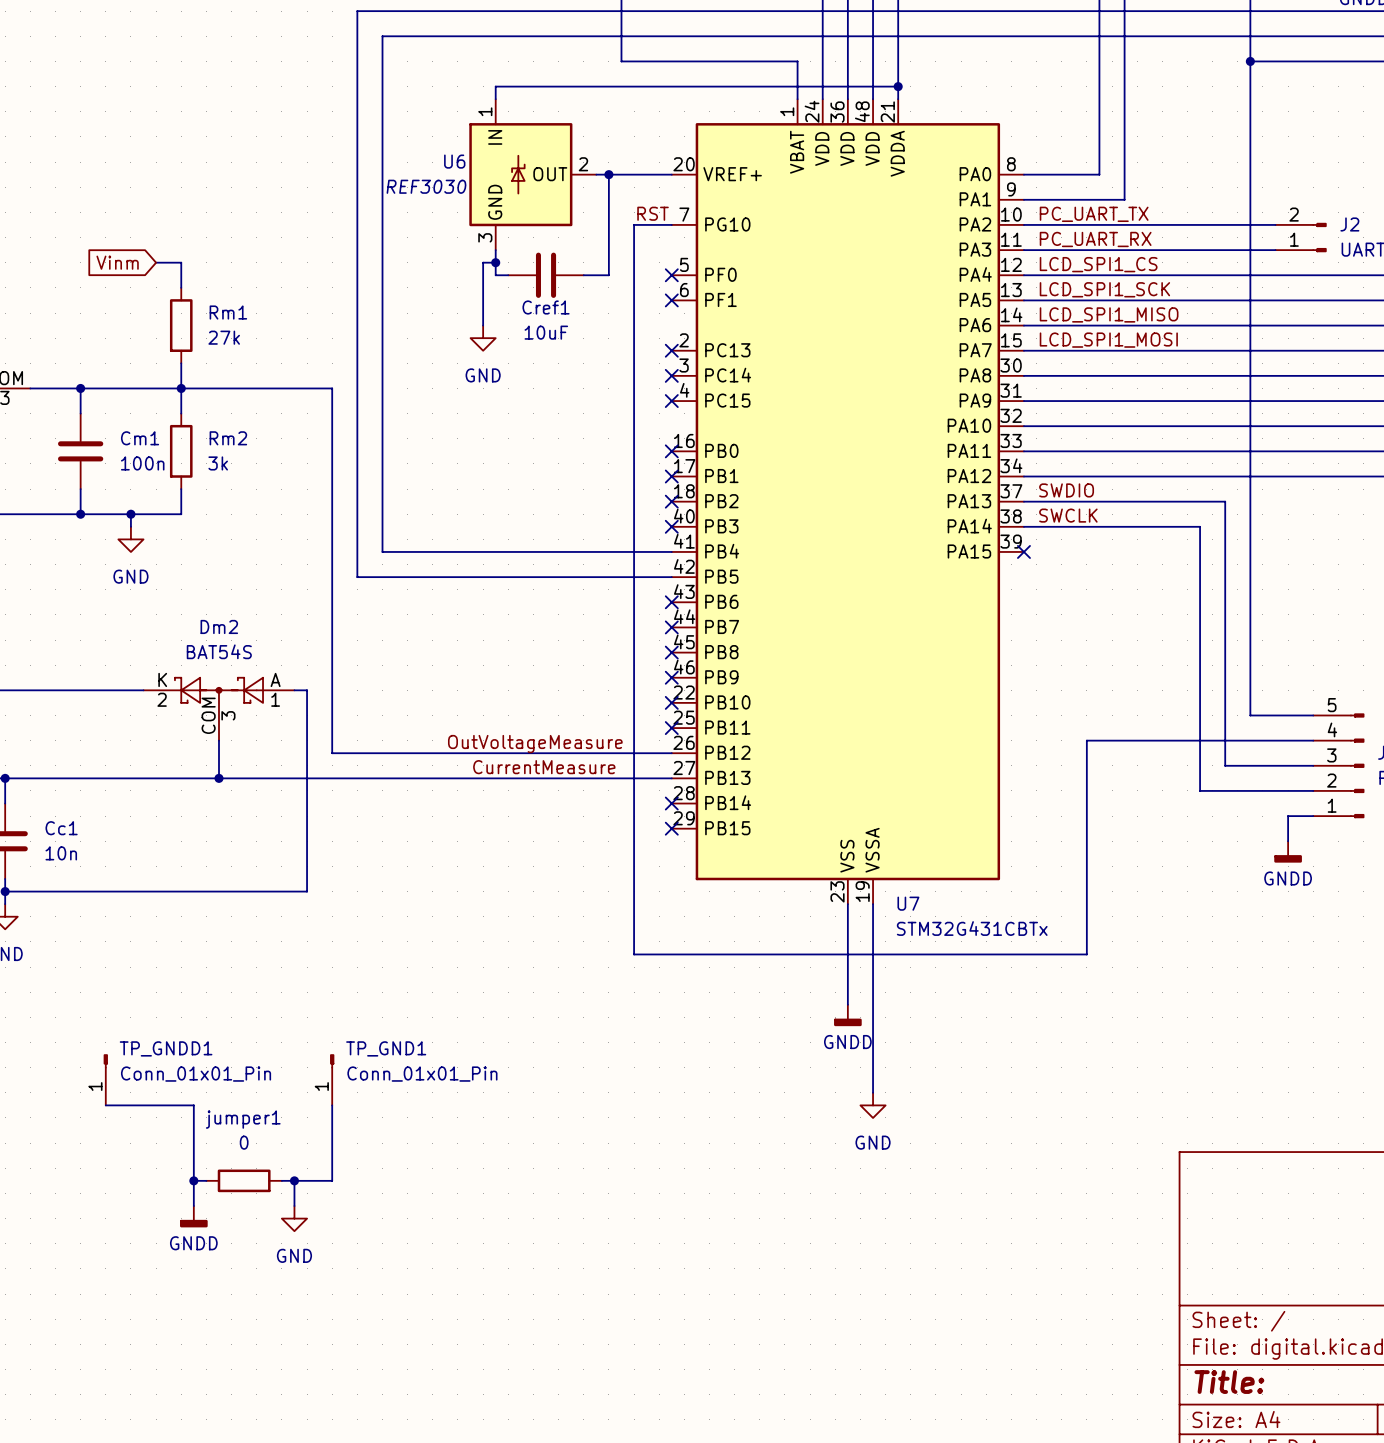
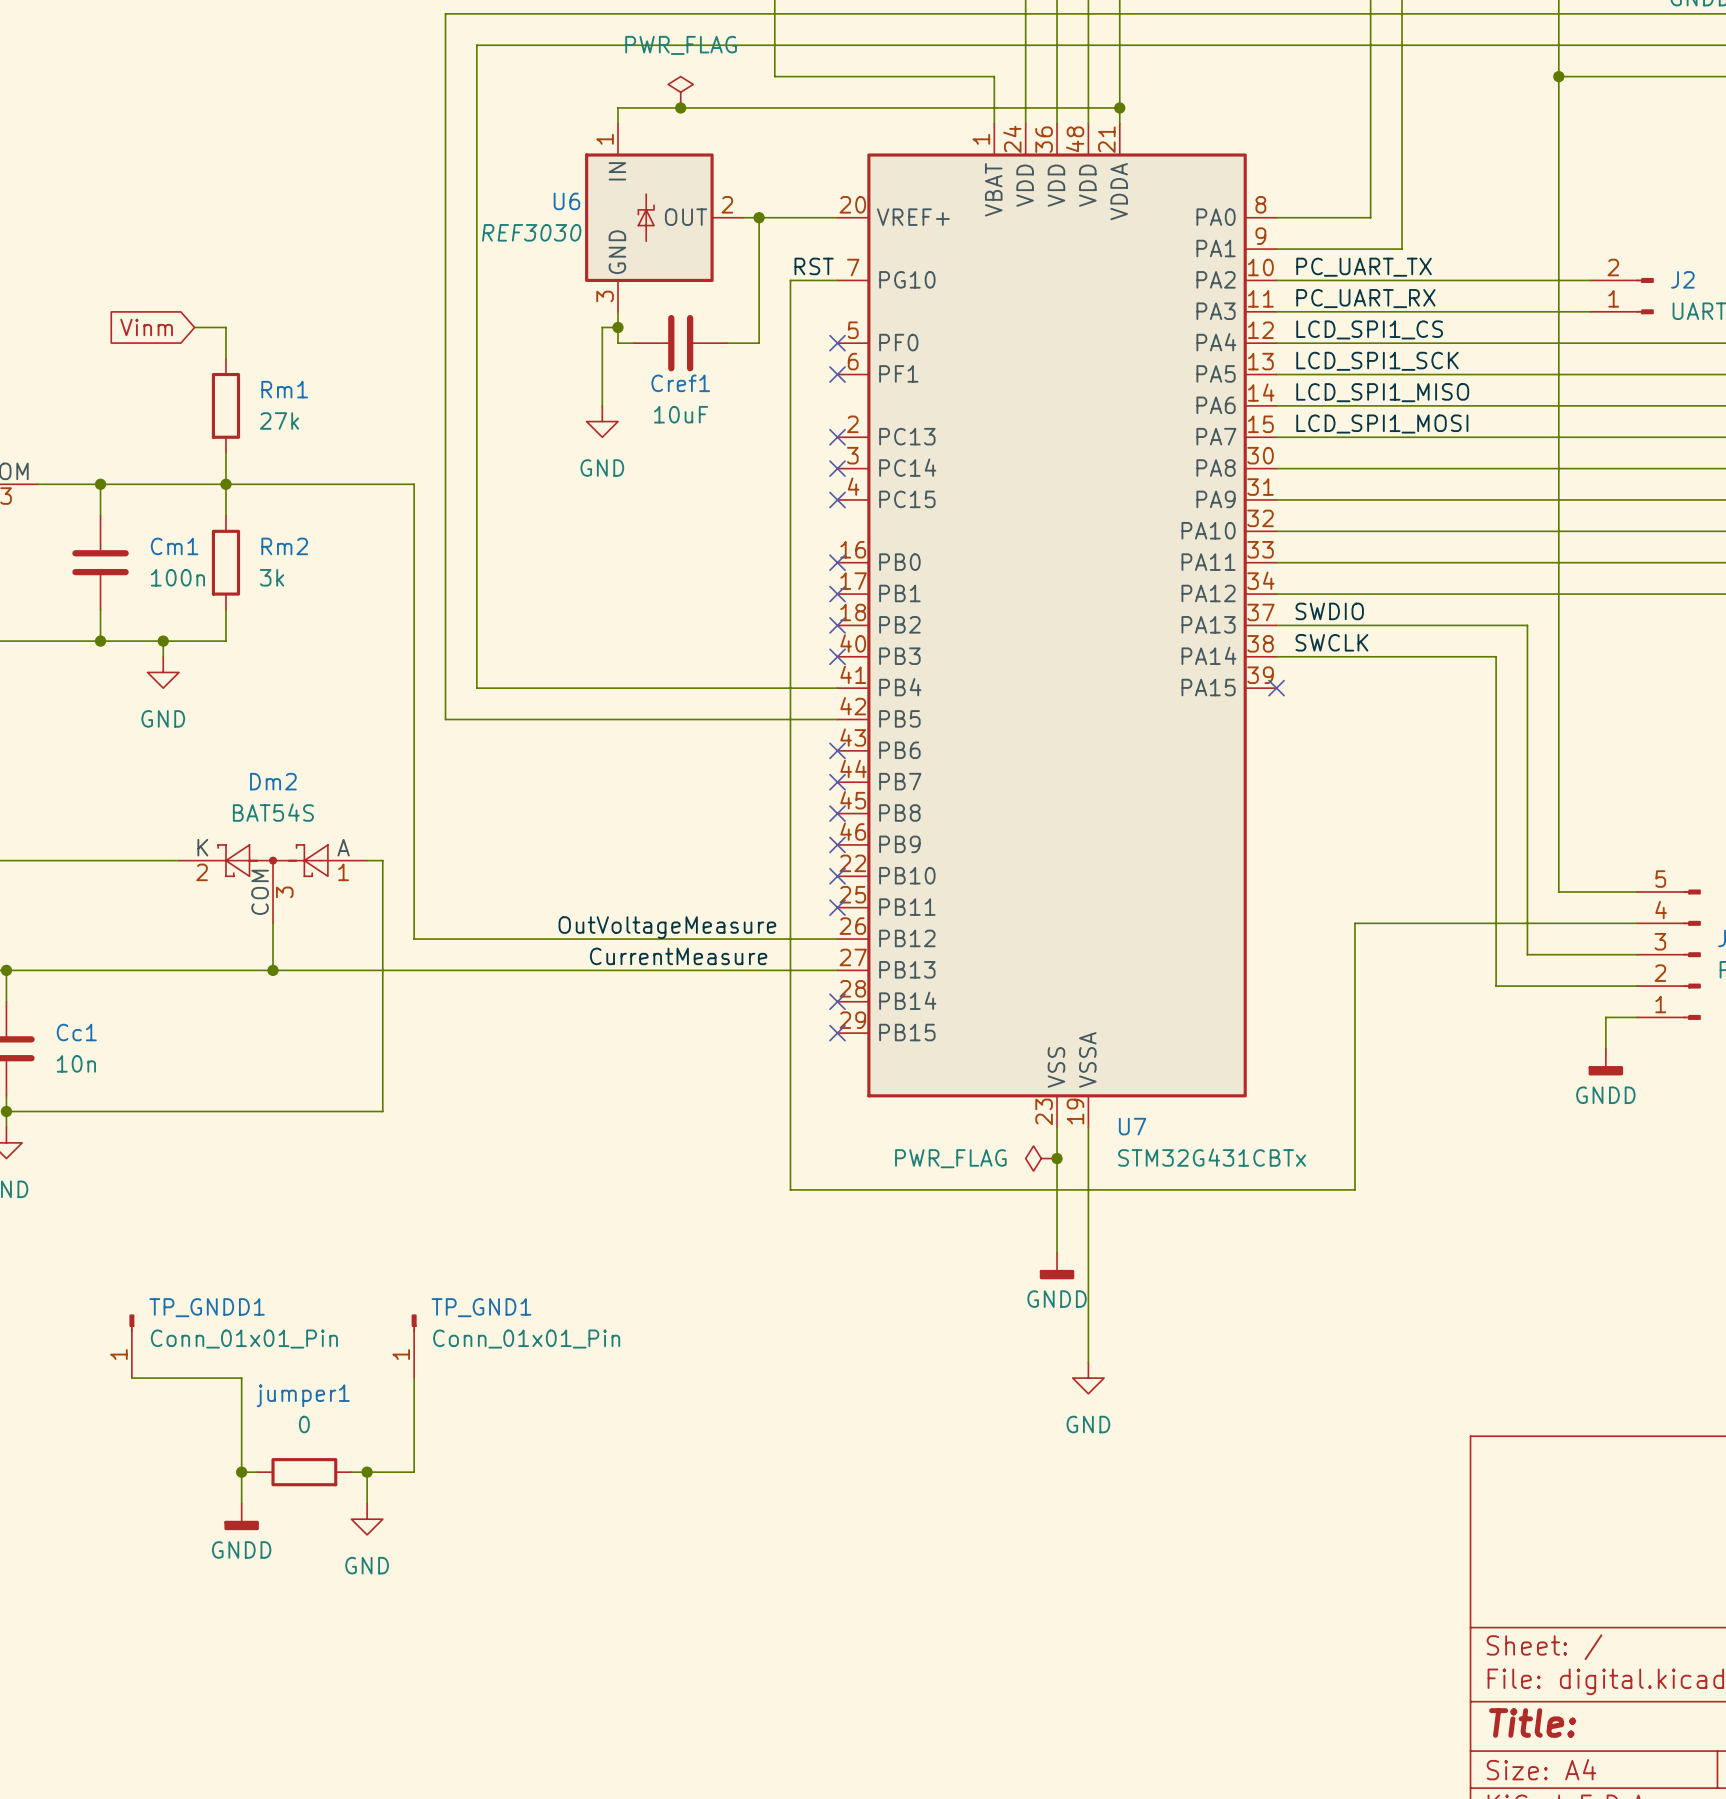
power symbol: none -> PWR_FLAG (680, 92)
junction: none -> (680, 107)
power symbol: none -> PWR_FLAG (1041, 1158)
junction: none -> (1057, 1158)

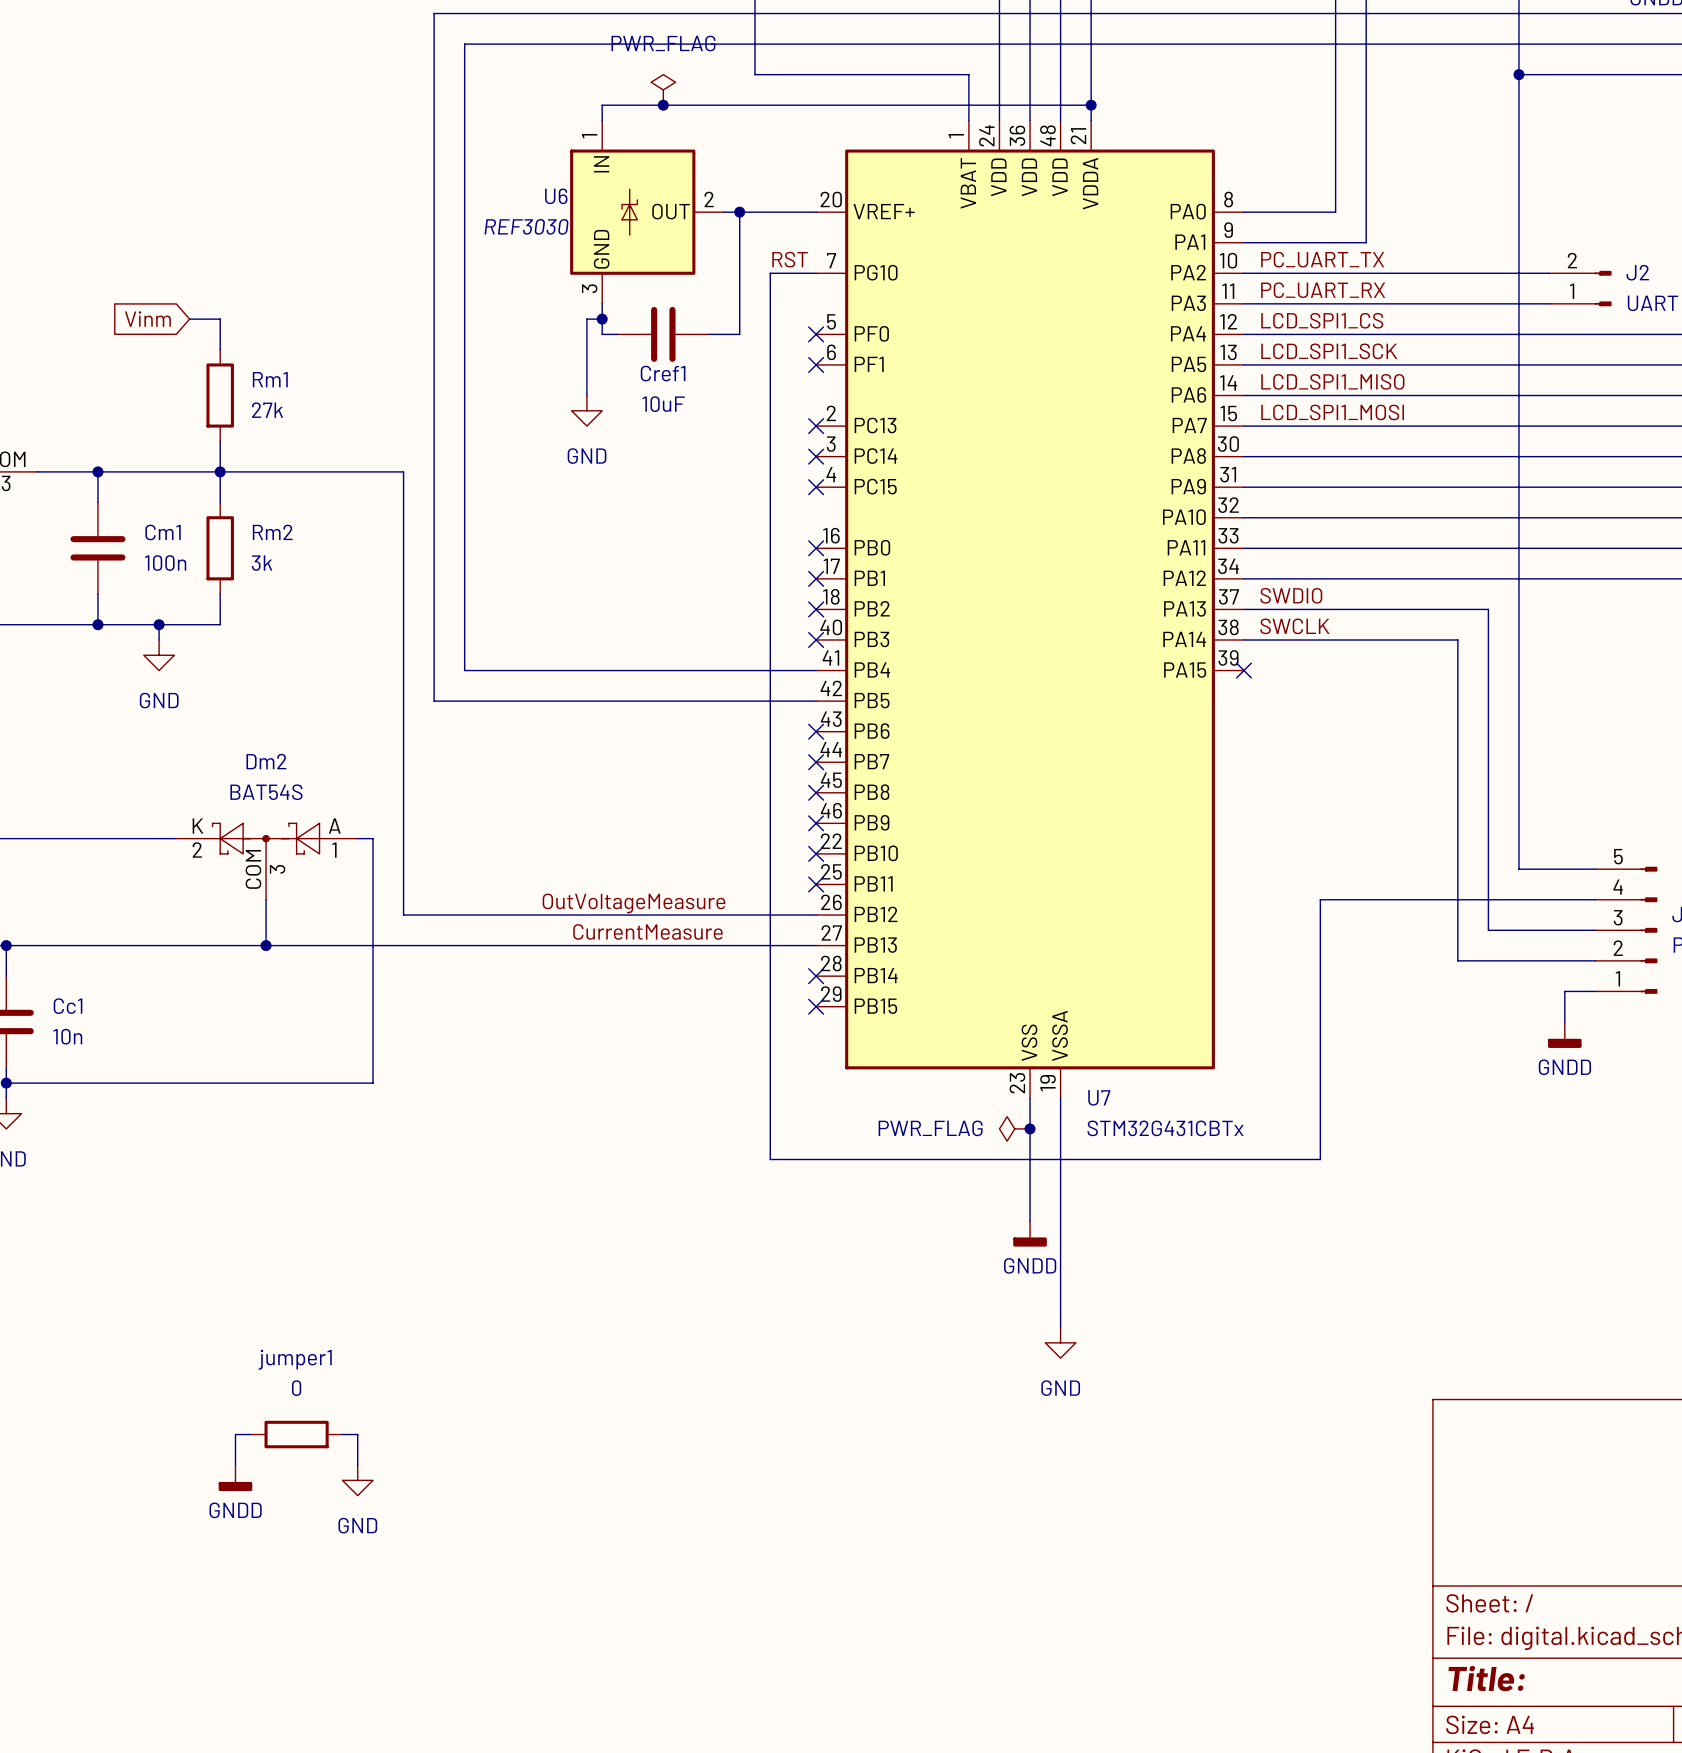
TP_GNDD1: Conn_01x01_Pin (131, 1346) -> none
TP_GND1: Conn_01x01_Pin (414, 1346) -> none
wire: (131, 1378) (241, 1378) (241, 1472) -> none
wire: (414, 1378) (414, 1472) (367, 1472) -> none
junction: (241, 1472) -> none
junction: (367, 1472) -> none

